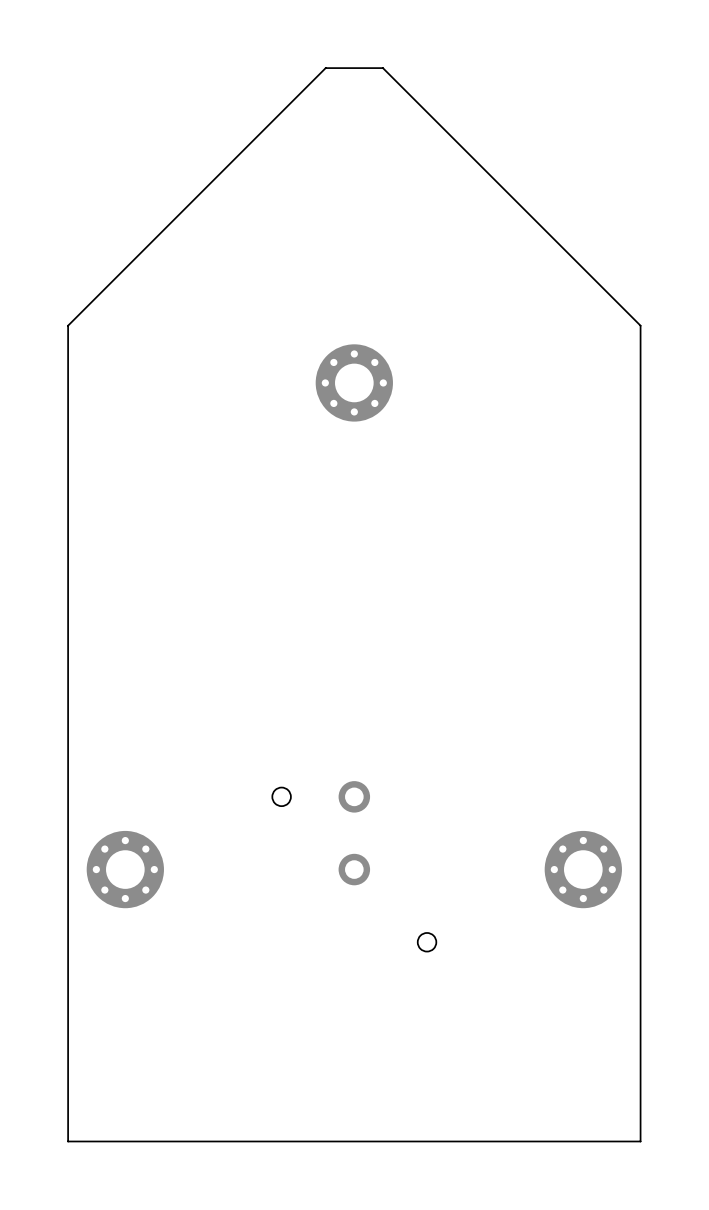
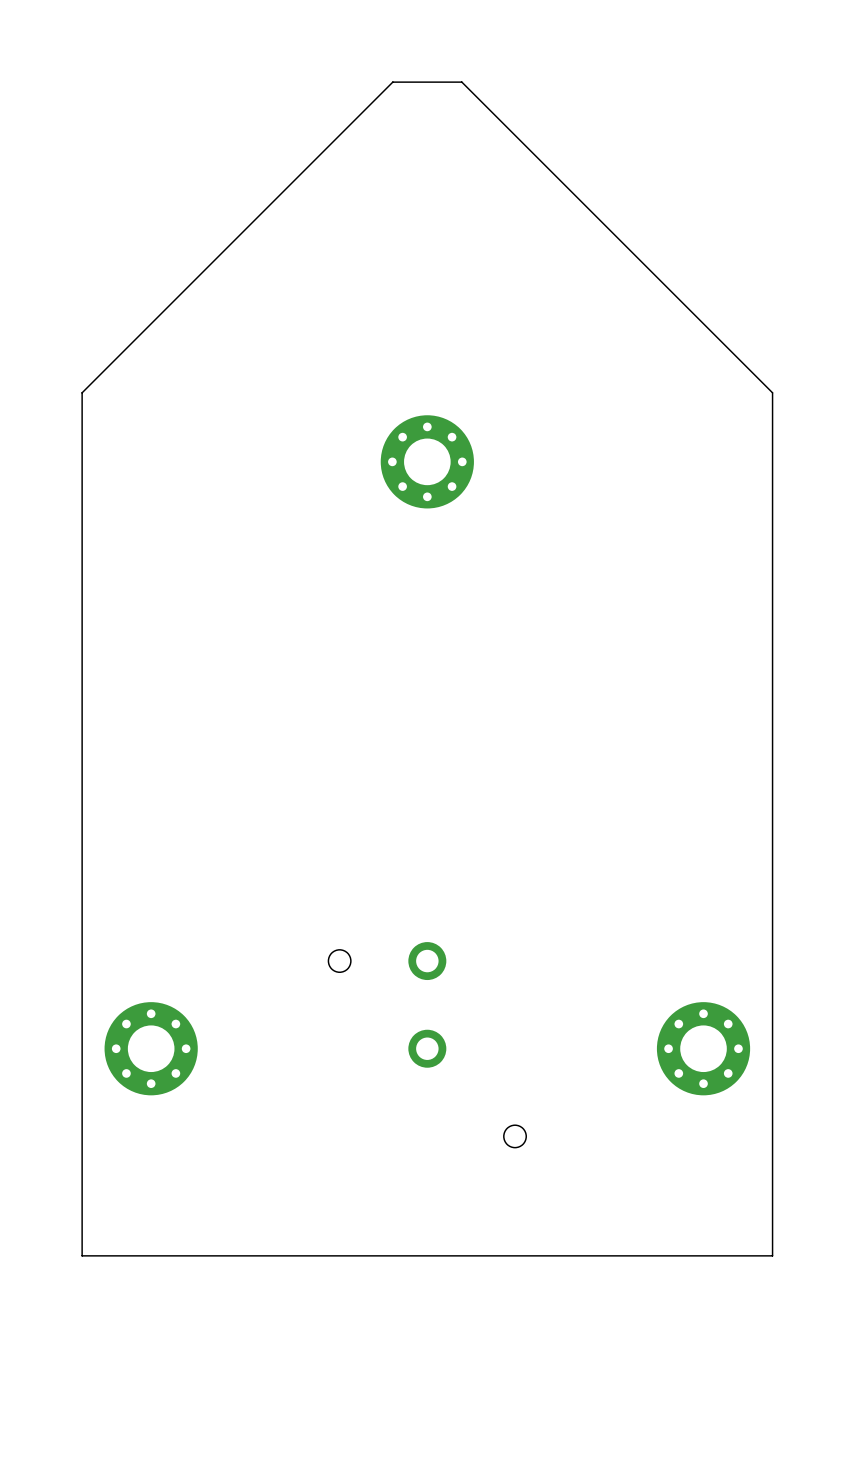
board edge: (640, 1041) (640, 1141) (68, 1141) (68, 1041) -> (772, 1255) (82, 1255)

